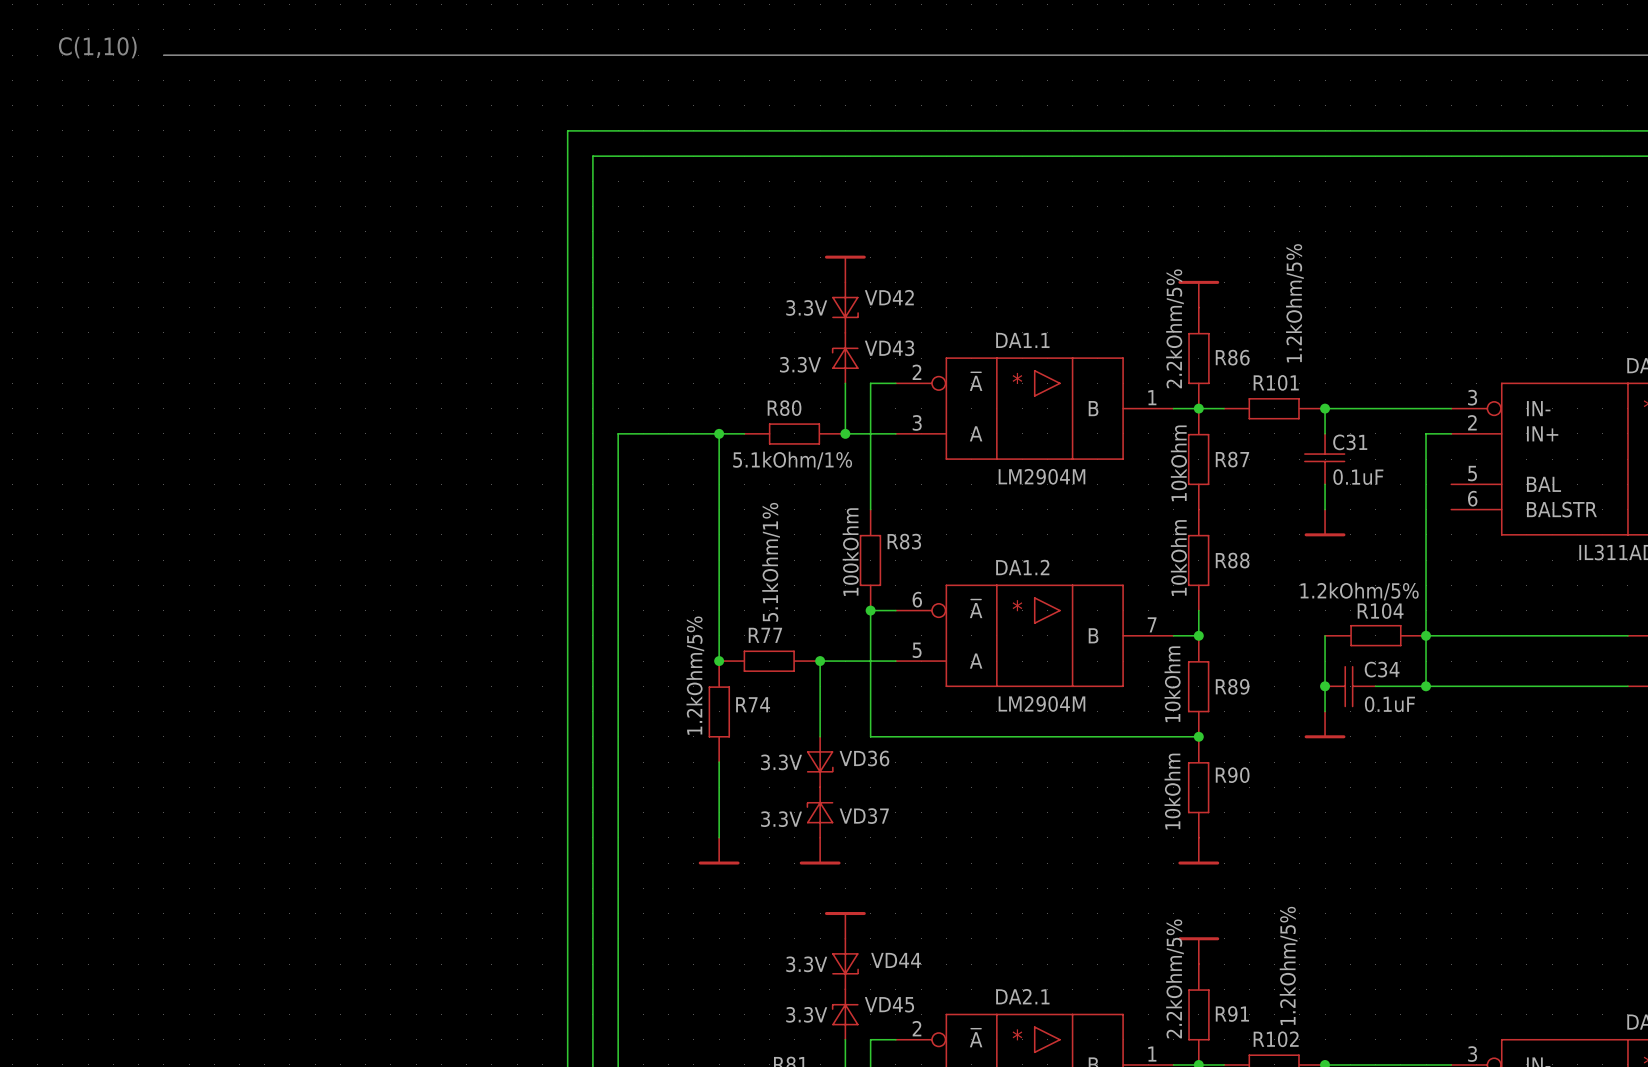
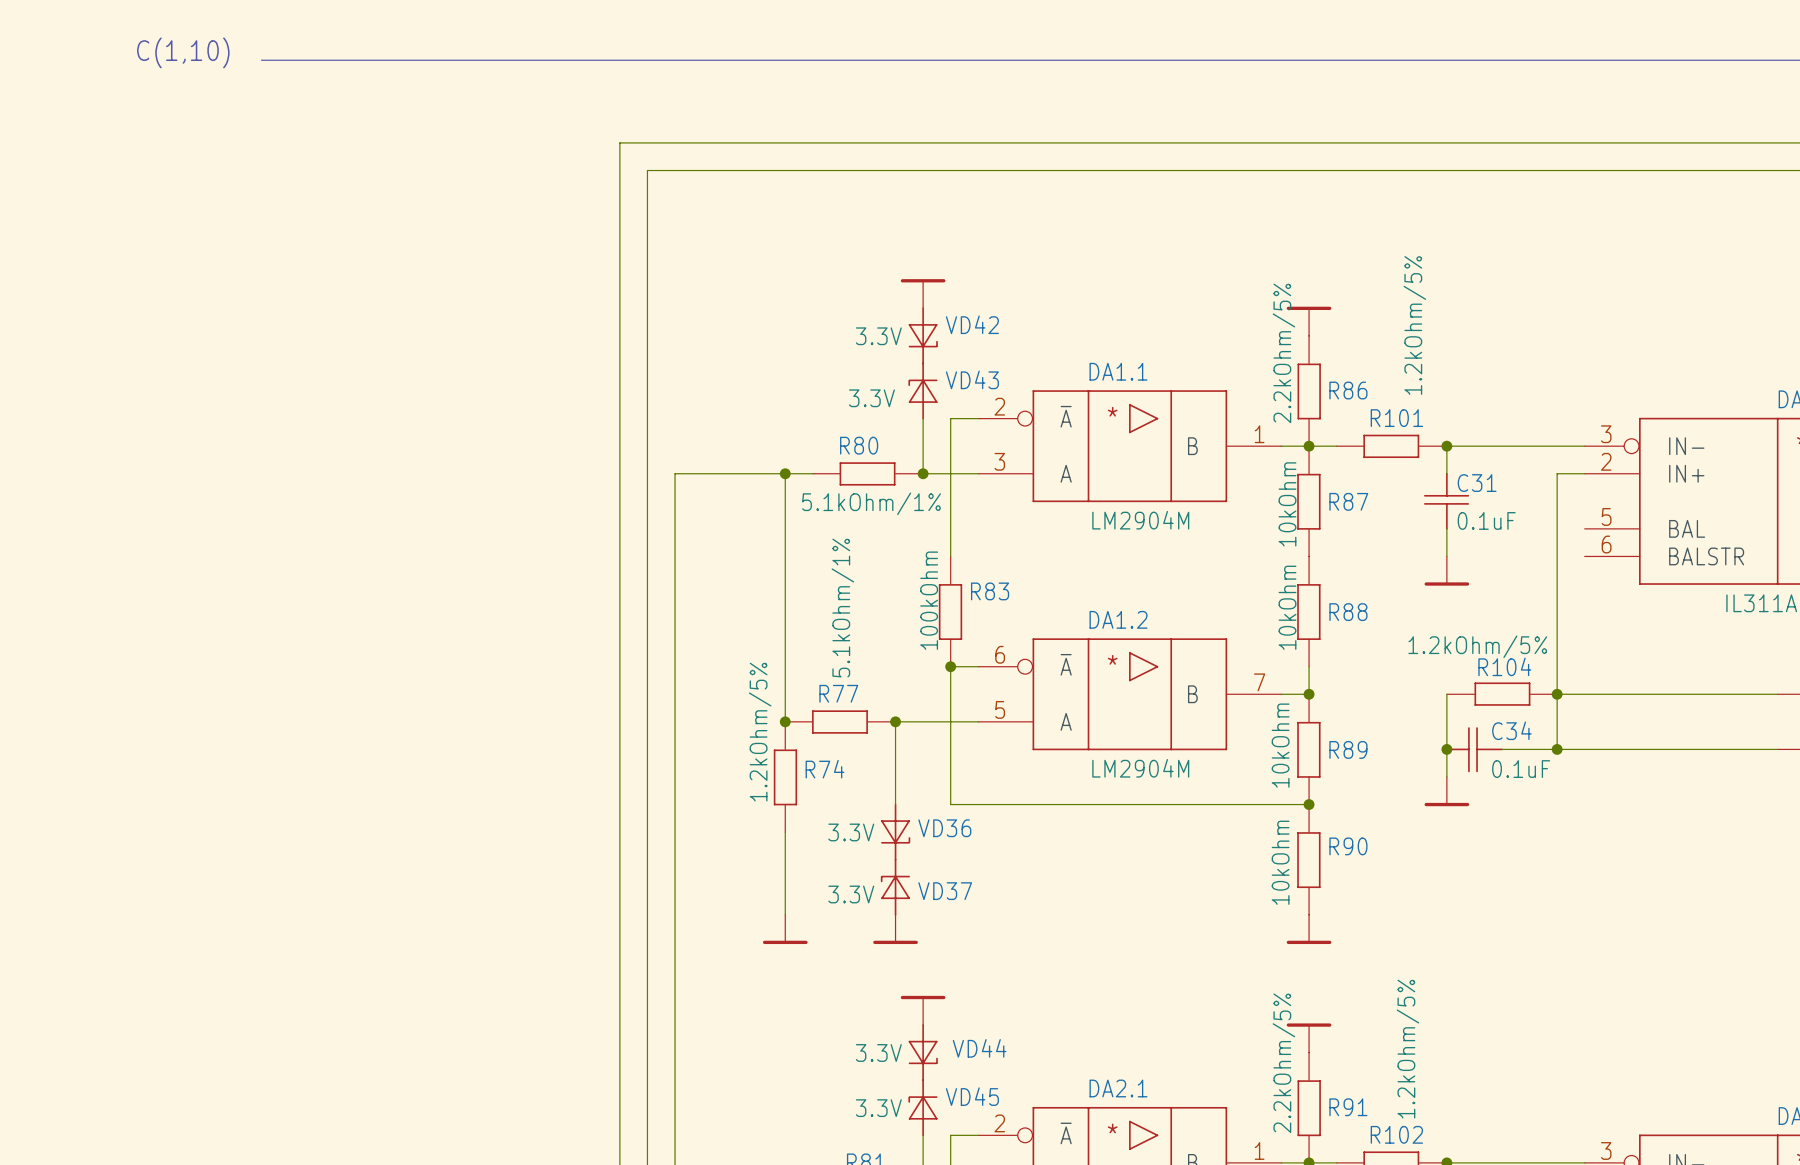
text position: C(1,10) (97, 47) -> C(1,10) (183, 52)
bus: (163, 55) (239, 55) -> none

